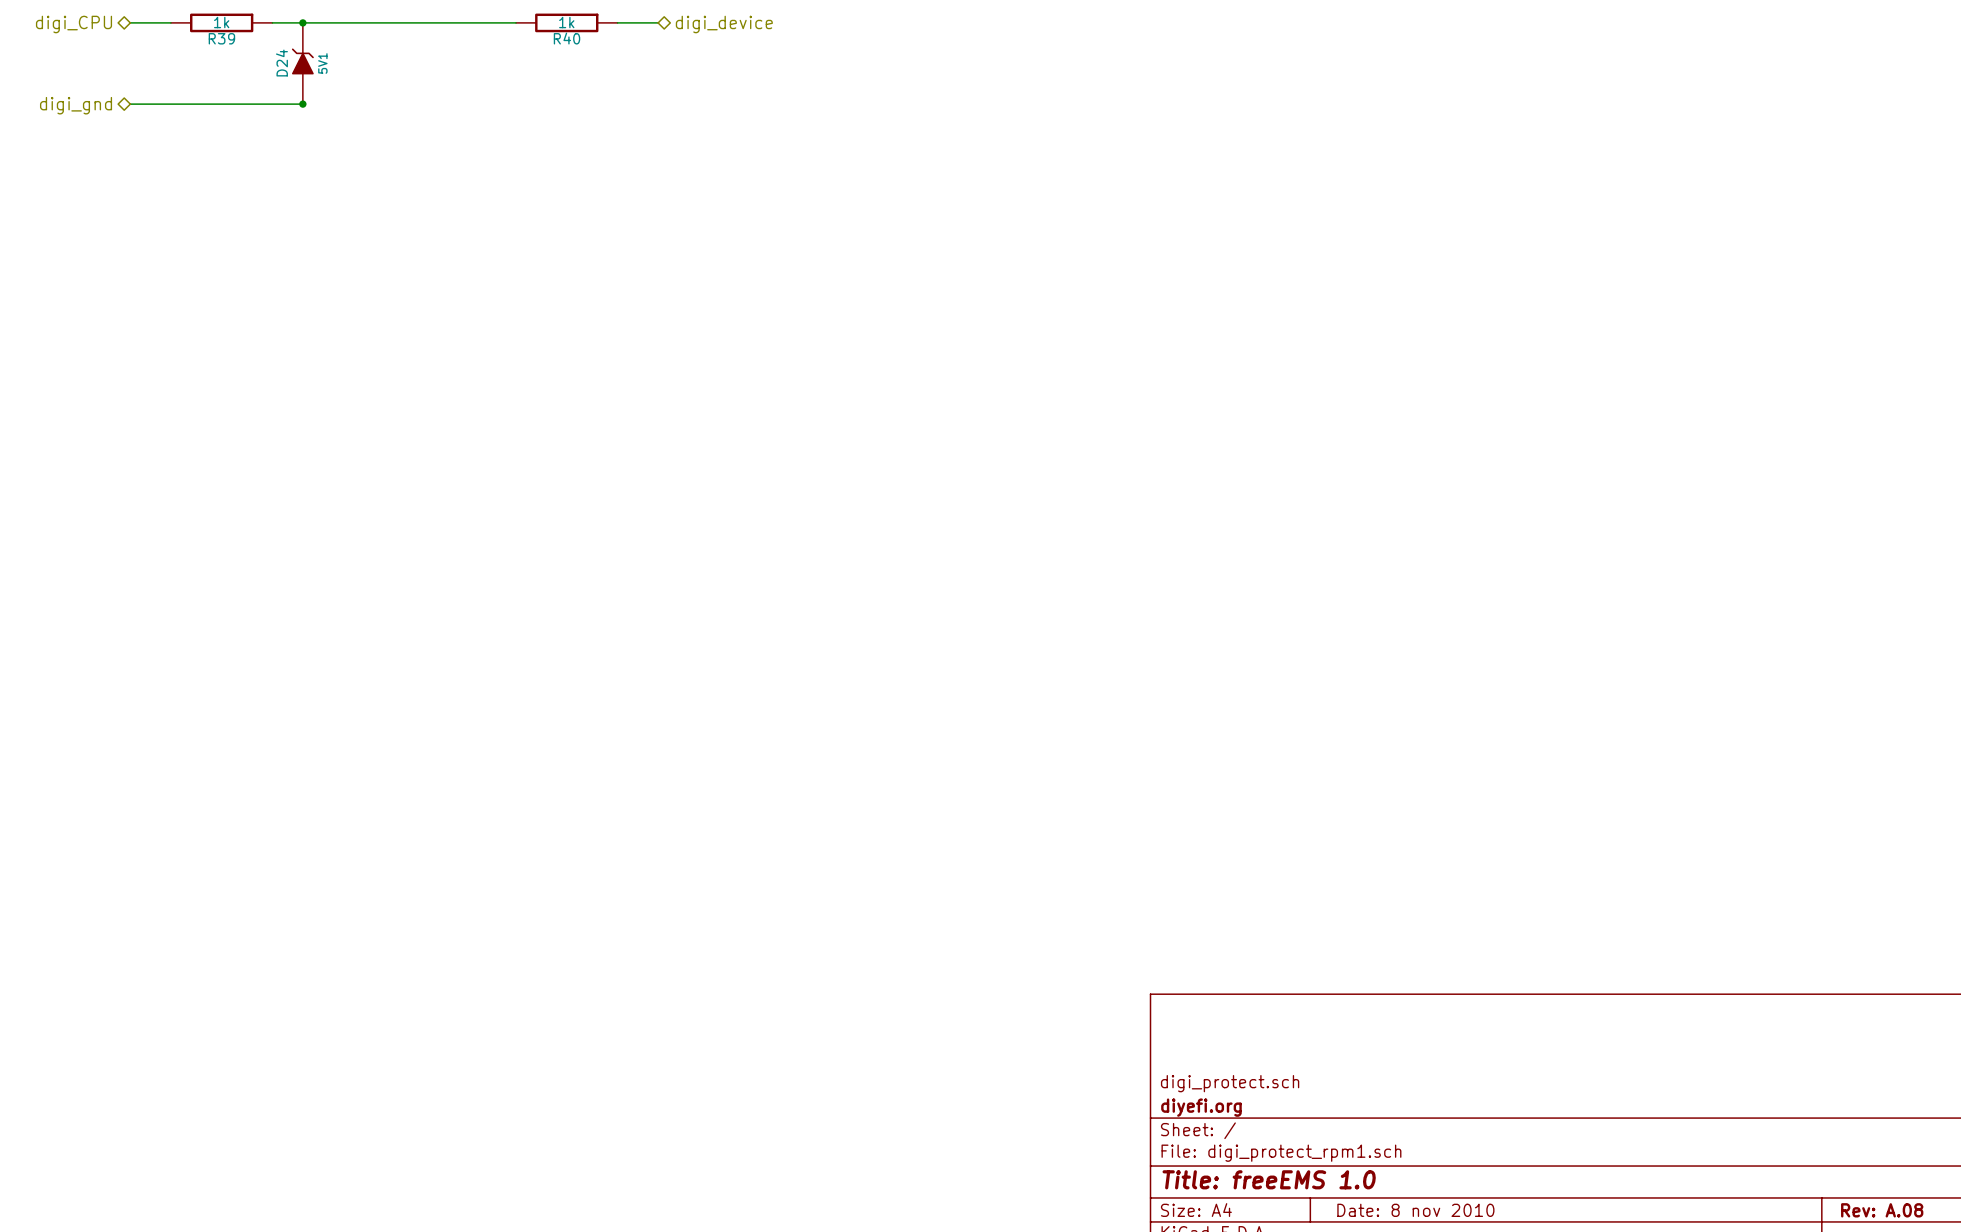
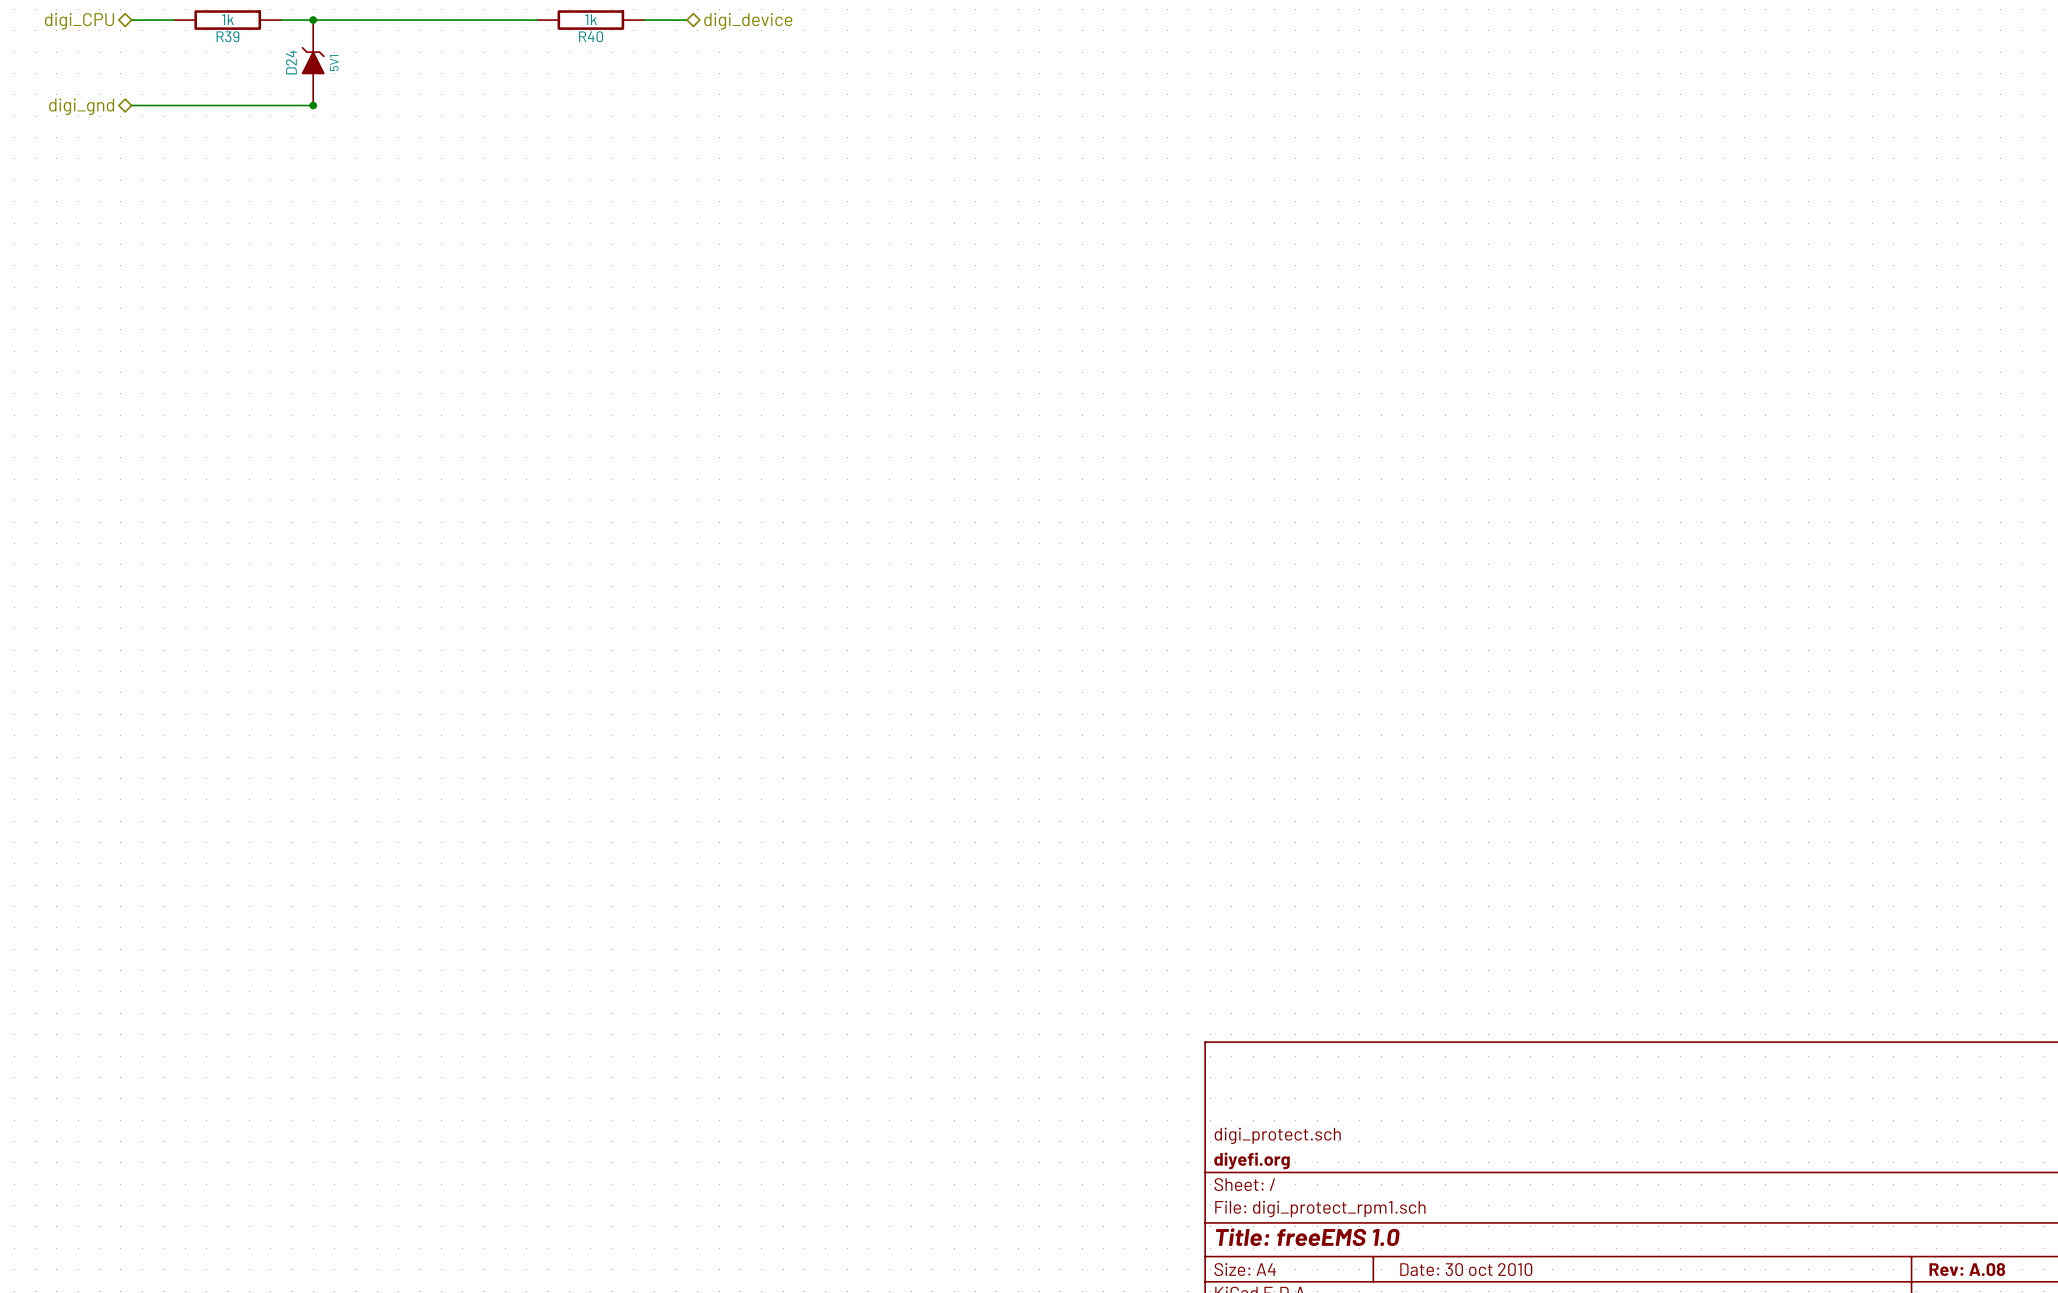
title block: Date: 8 nov 2010 (1415, 1210) -> Date: 30 oct 2010 (1466, 1269)

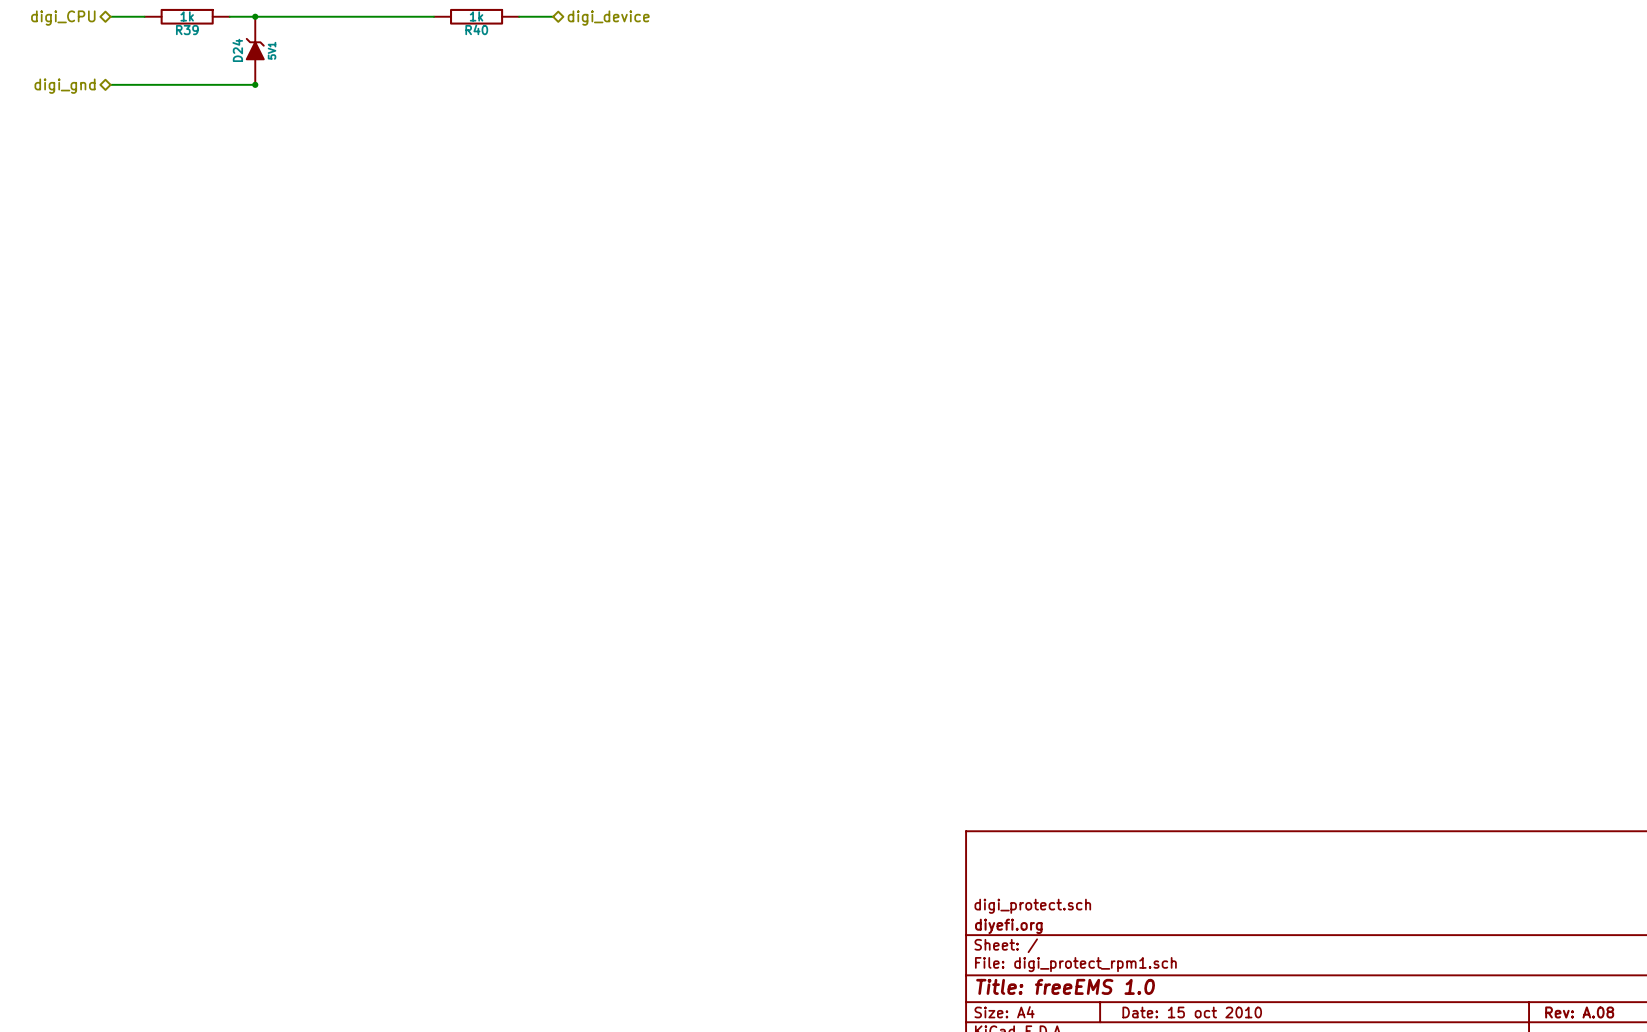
title block: Date: 30 oct 2010 (1466, 1269) -> Date: 15 oct 2010 (1192, 1012)

